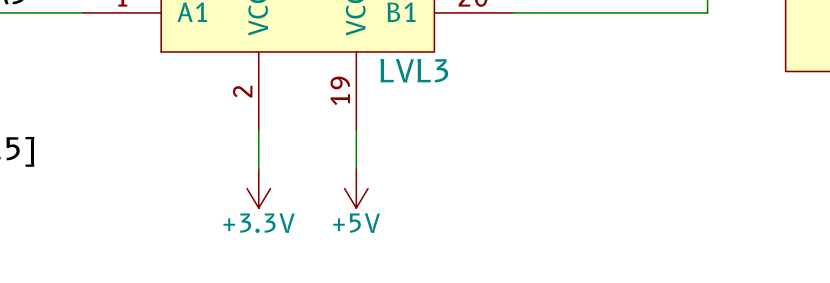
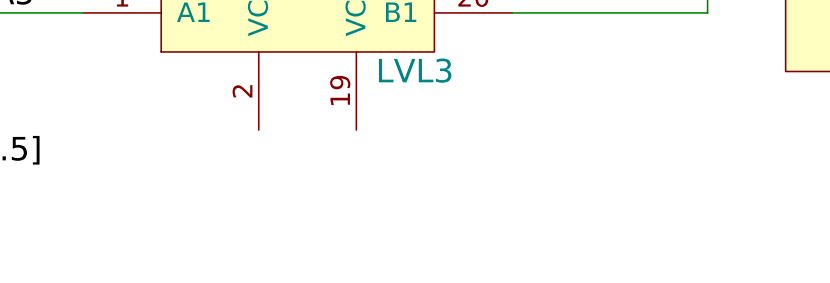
wire: (258, 130) (258, 169) -> none
wire: (356, 130) (356, 169) -> none
power symbol: +3.3V (258, 188) -> none
power symbol: +5V (356, 188) -> none

